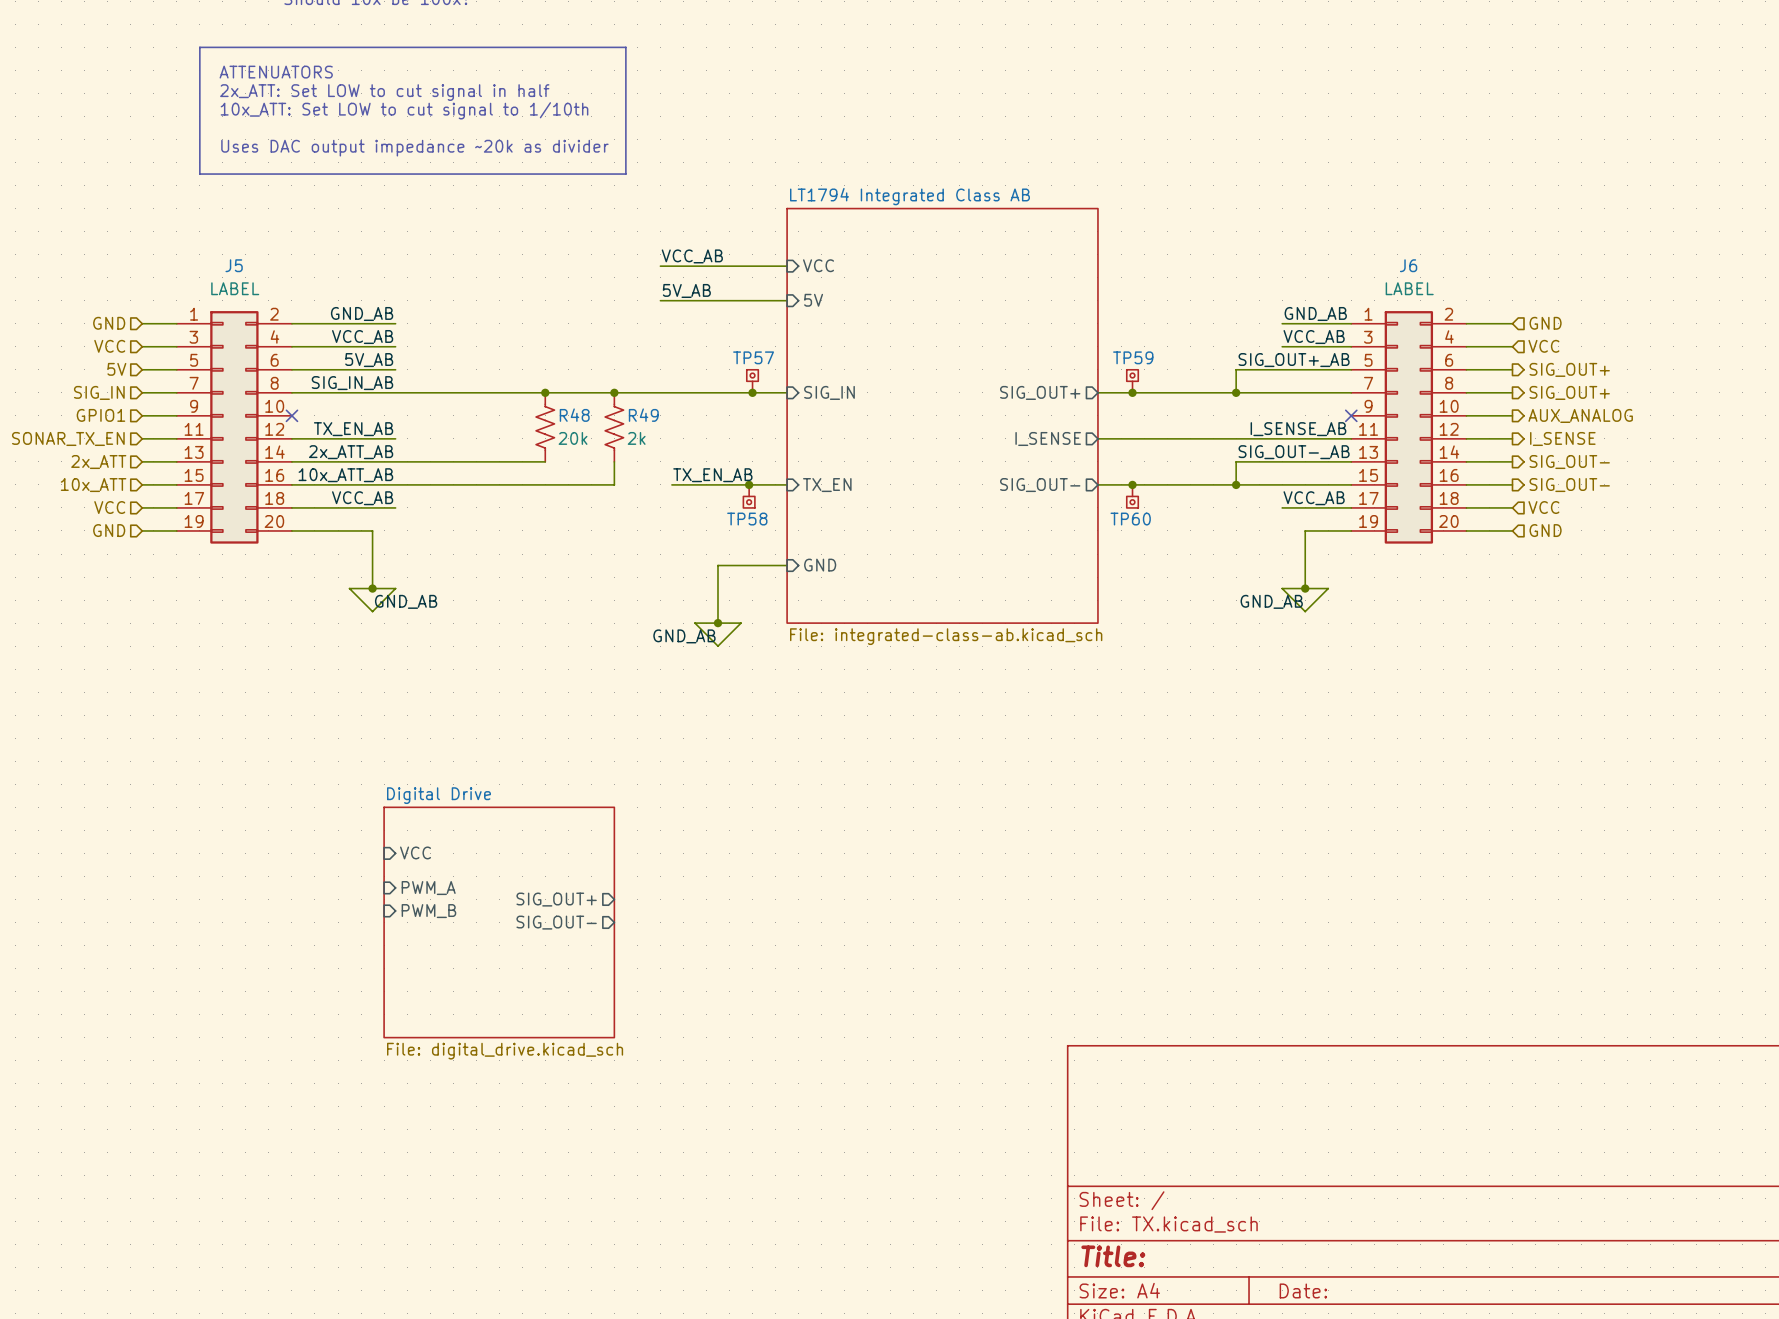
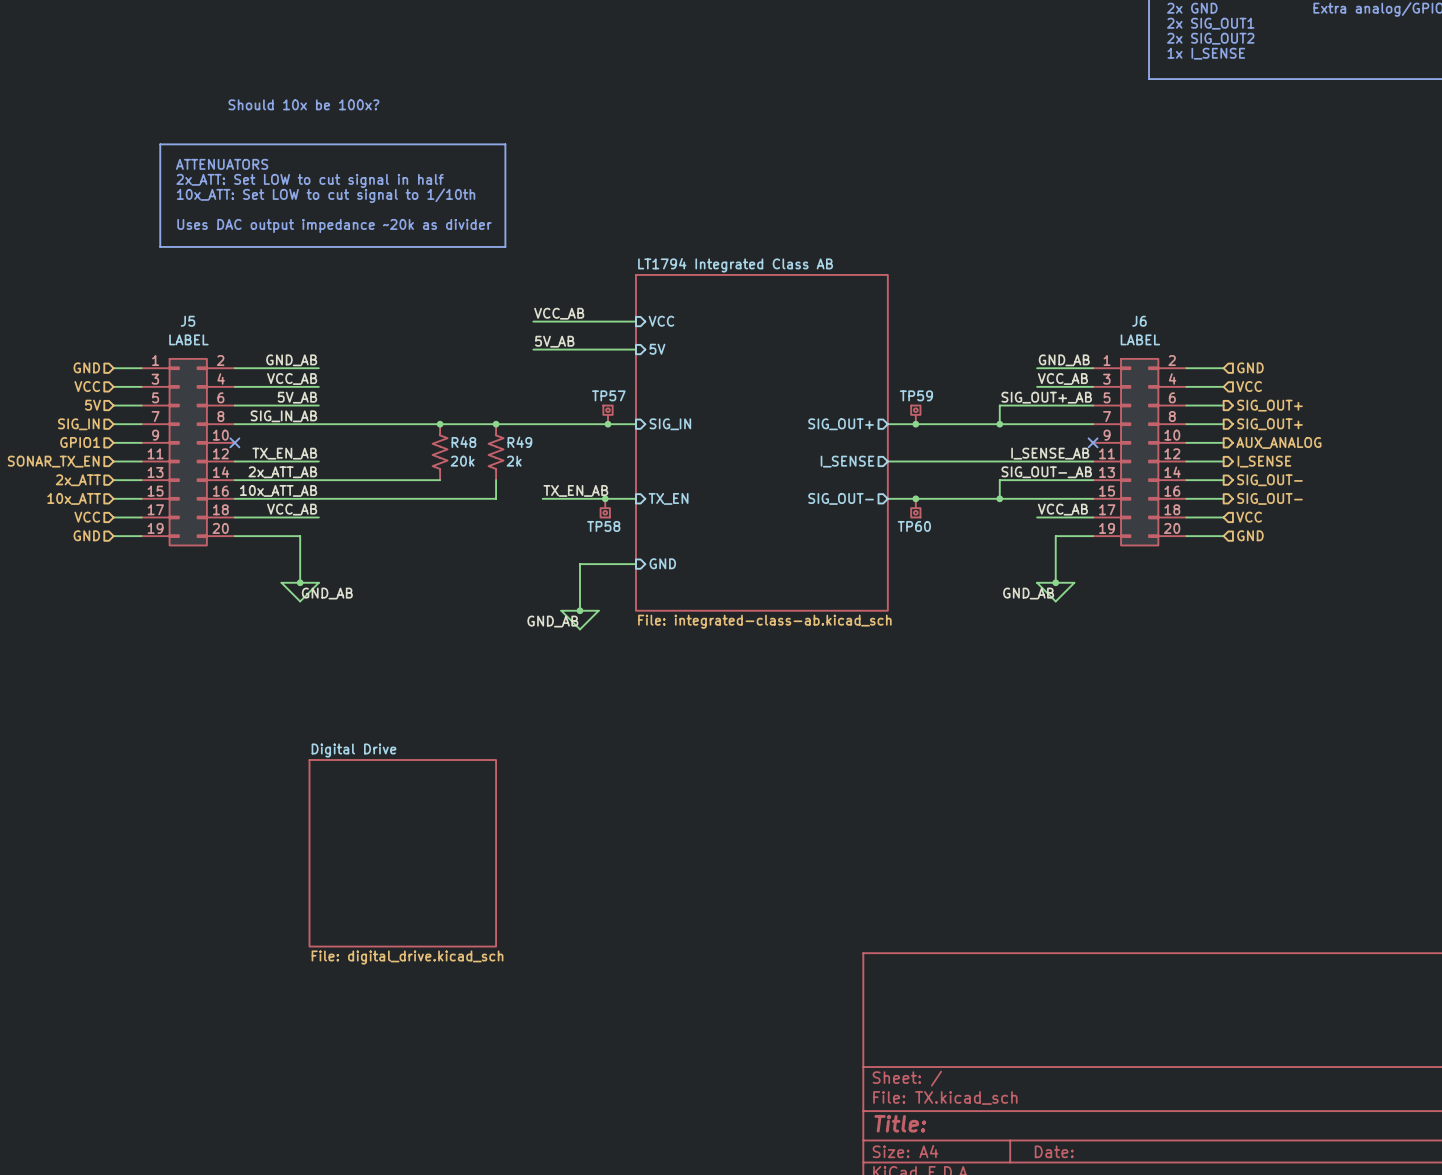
sheet pin: VCC (415, 852) -> none
sheet pin: PWM_A (428, 888) -> none
sheet pin: SIG_OUT+ (556, 899) -> none
sheet pin: PWM_B (428, 911) -> none
sheet pin: SIG_OUT- (556, 922) -> none

